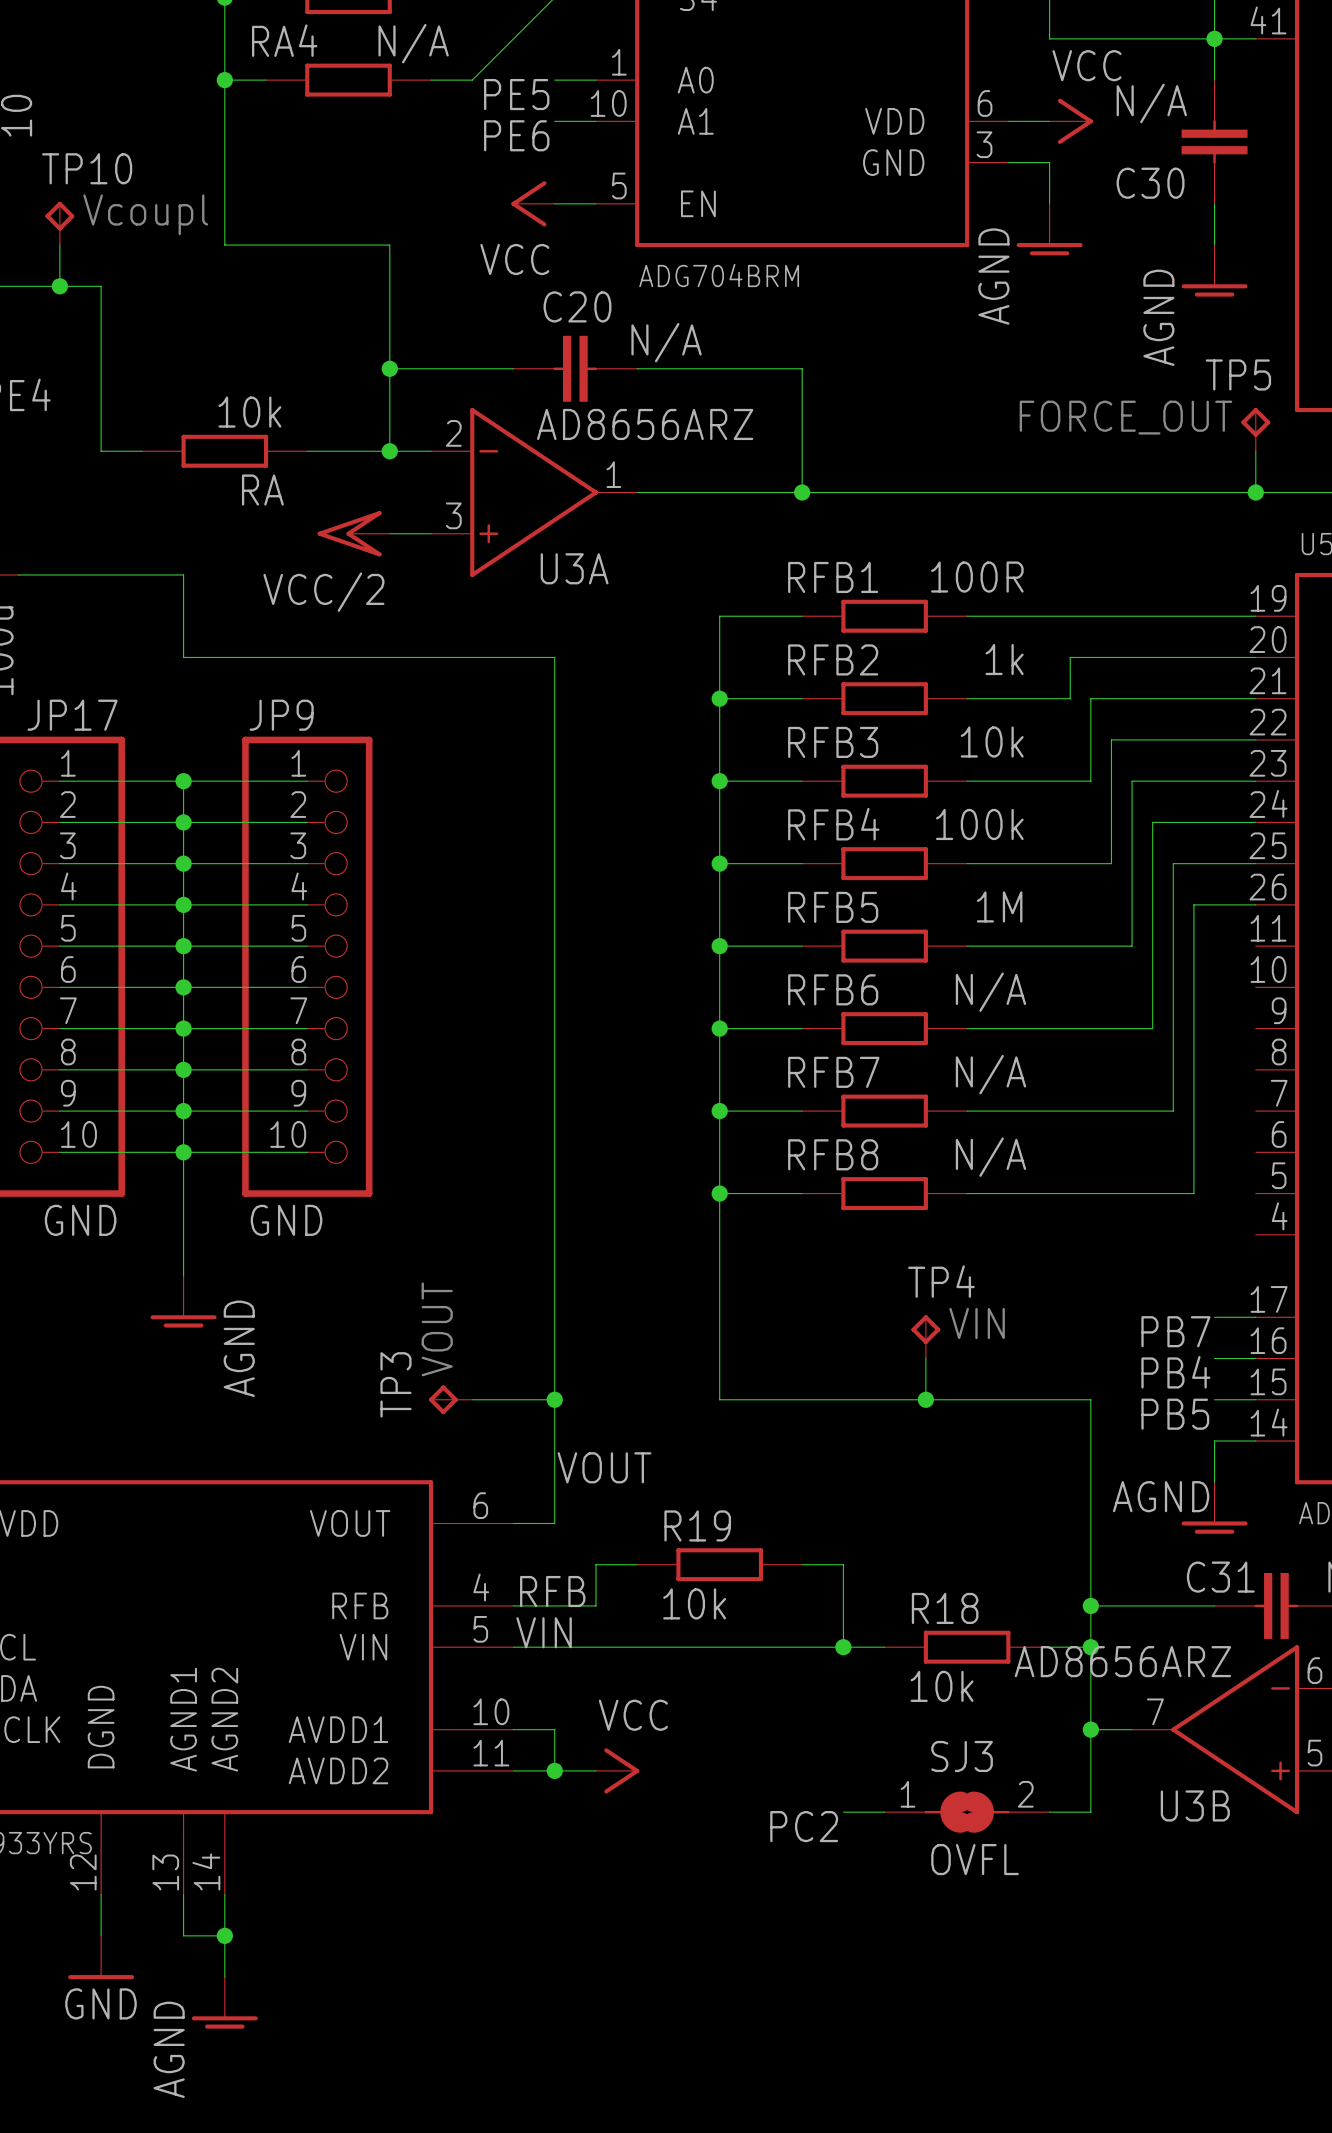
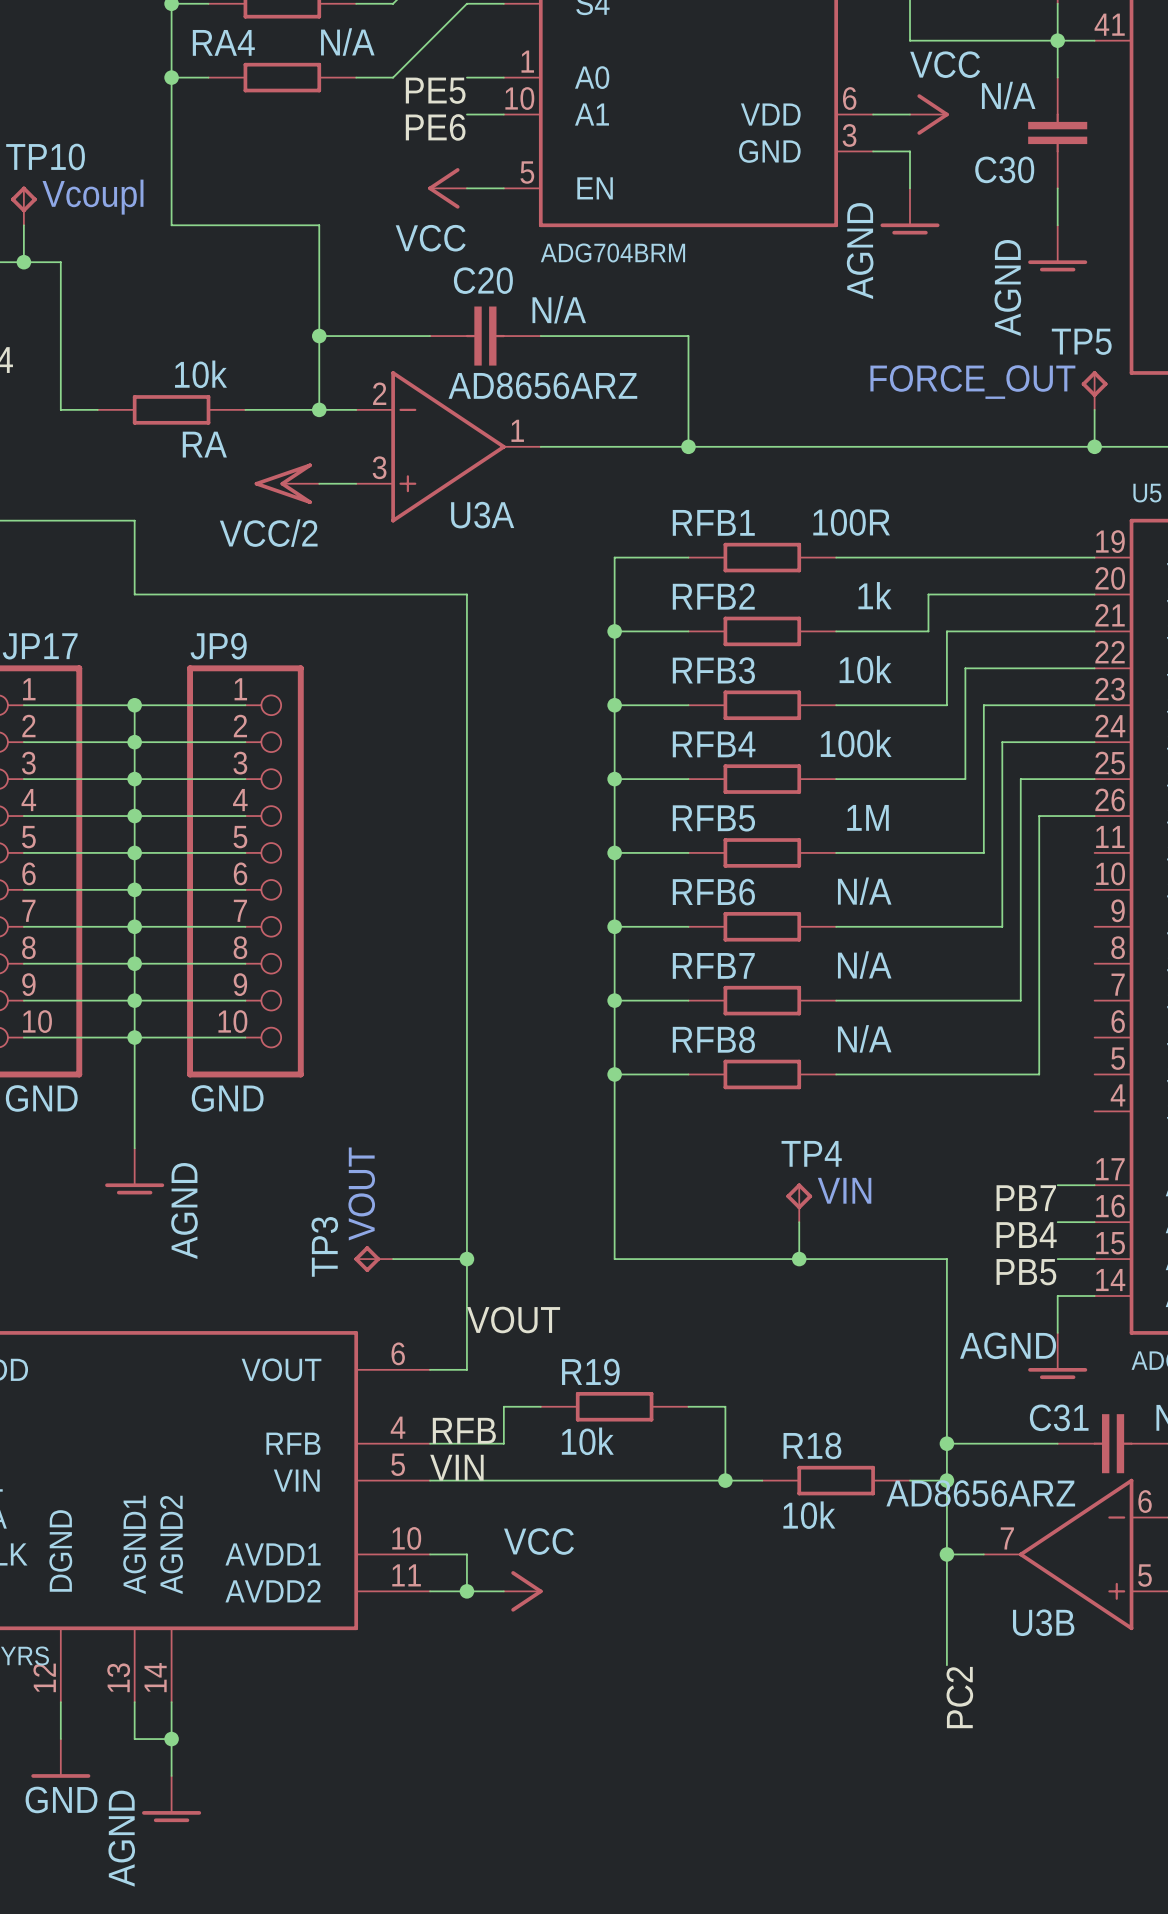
wire: (843, 1812) (884, 1812) -> none
SJ3: OVFL (967, 1812) -> none
wire: (1049, 1812) (1090, 1812) -> (946, 1665) (946, 1628)
label rotation: 0° (804, 1826) -> 90° counterclockwise (959, 1697)
label position: PC2 (804, 1826) -> PC2 (959, 1697)

